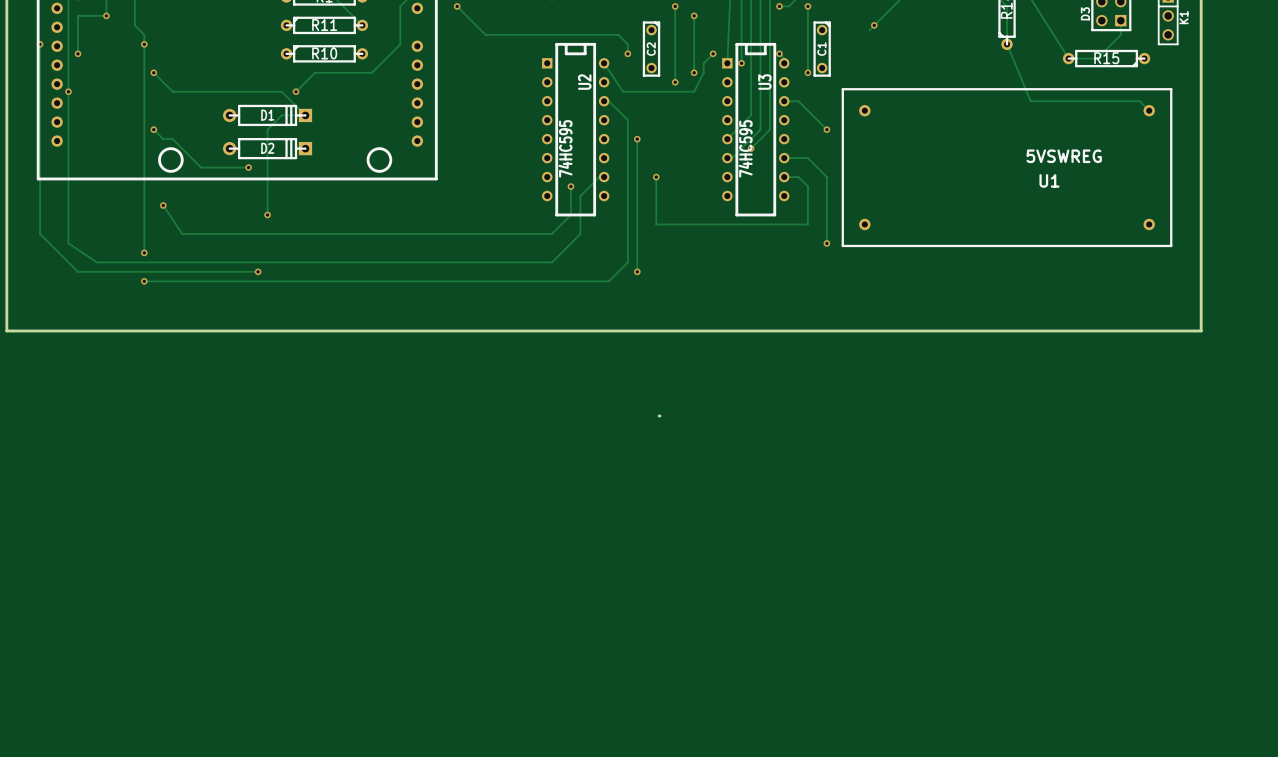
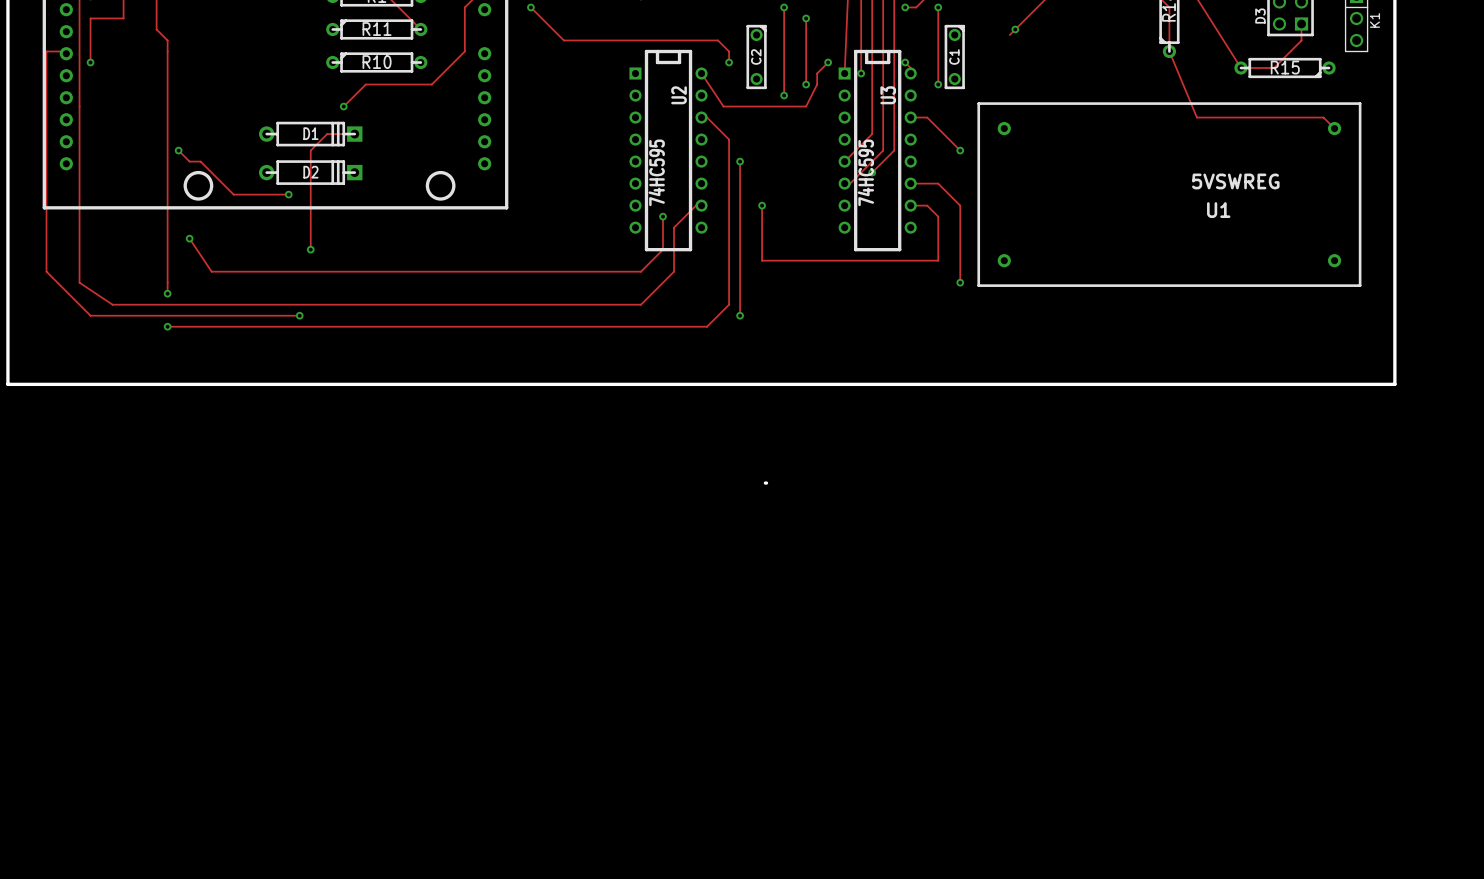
via: (106, 15) -> none
track: none -> (46, 51) (64, 51) (66, 53)
via: (40, 44) -> none
via: (144, 44) -> none
track: (153, 72) (172, 91) (281, 91) (305, 115) -> none
via: (153, 72) -> none
via: (68, 91) -> none

